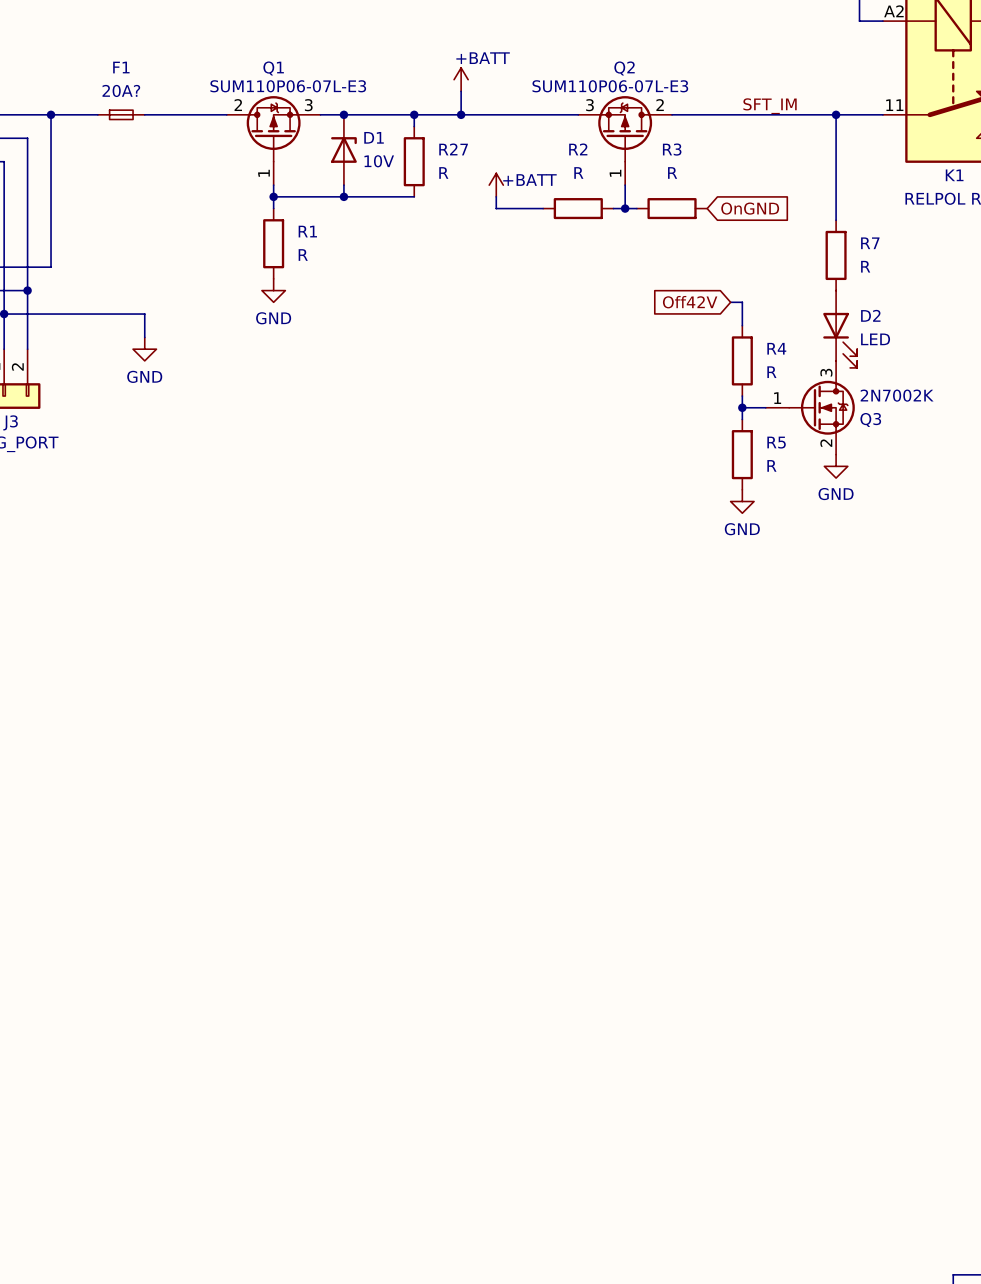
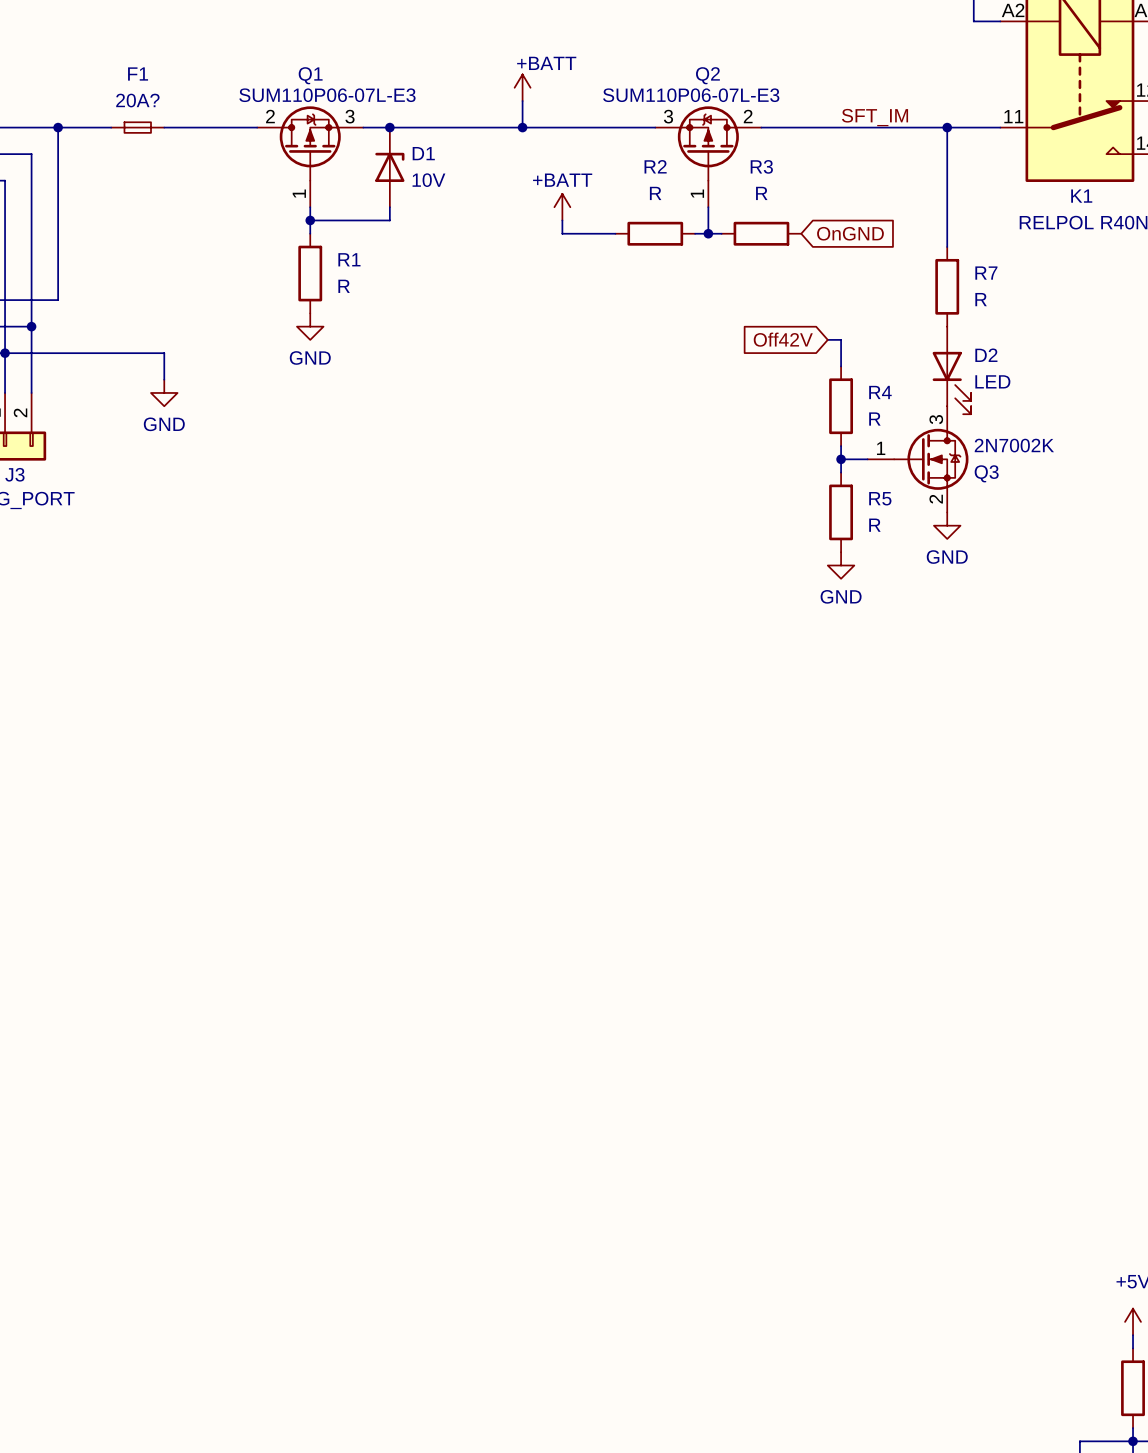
wire: (414, 114) (414, 126) -> none
junction: (414, 114) -> none
R27: R (414, 161) -> none
power symbol text position: +BATT (529, 180) -> +BATT (562, 180)
wire: (343, 196) (414, 196) -> none
junction: (343, 196) -> none

